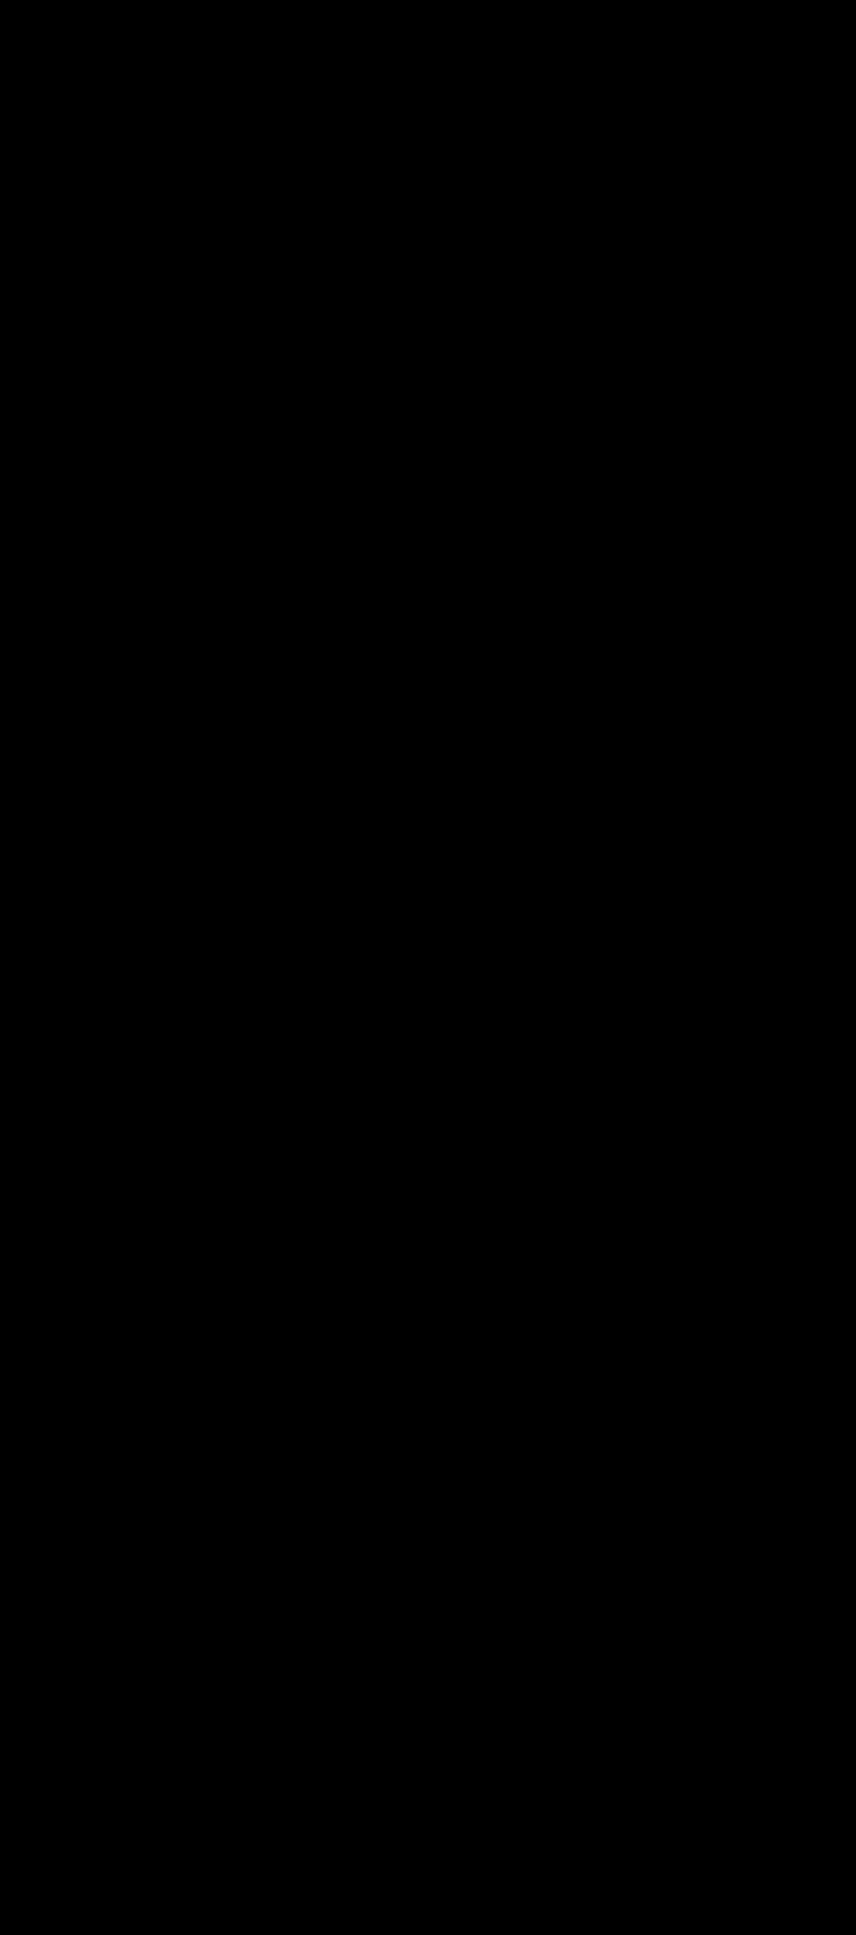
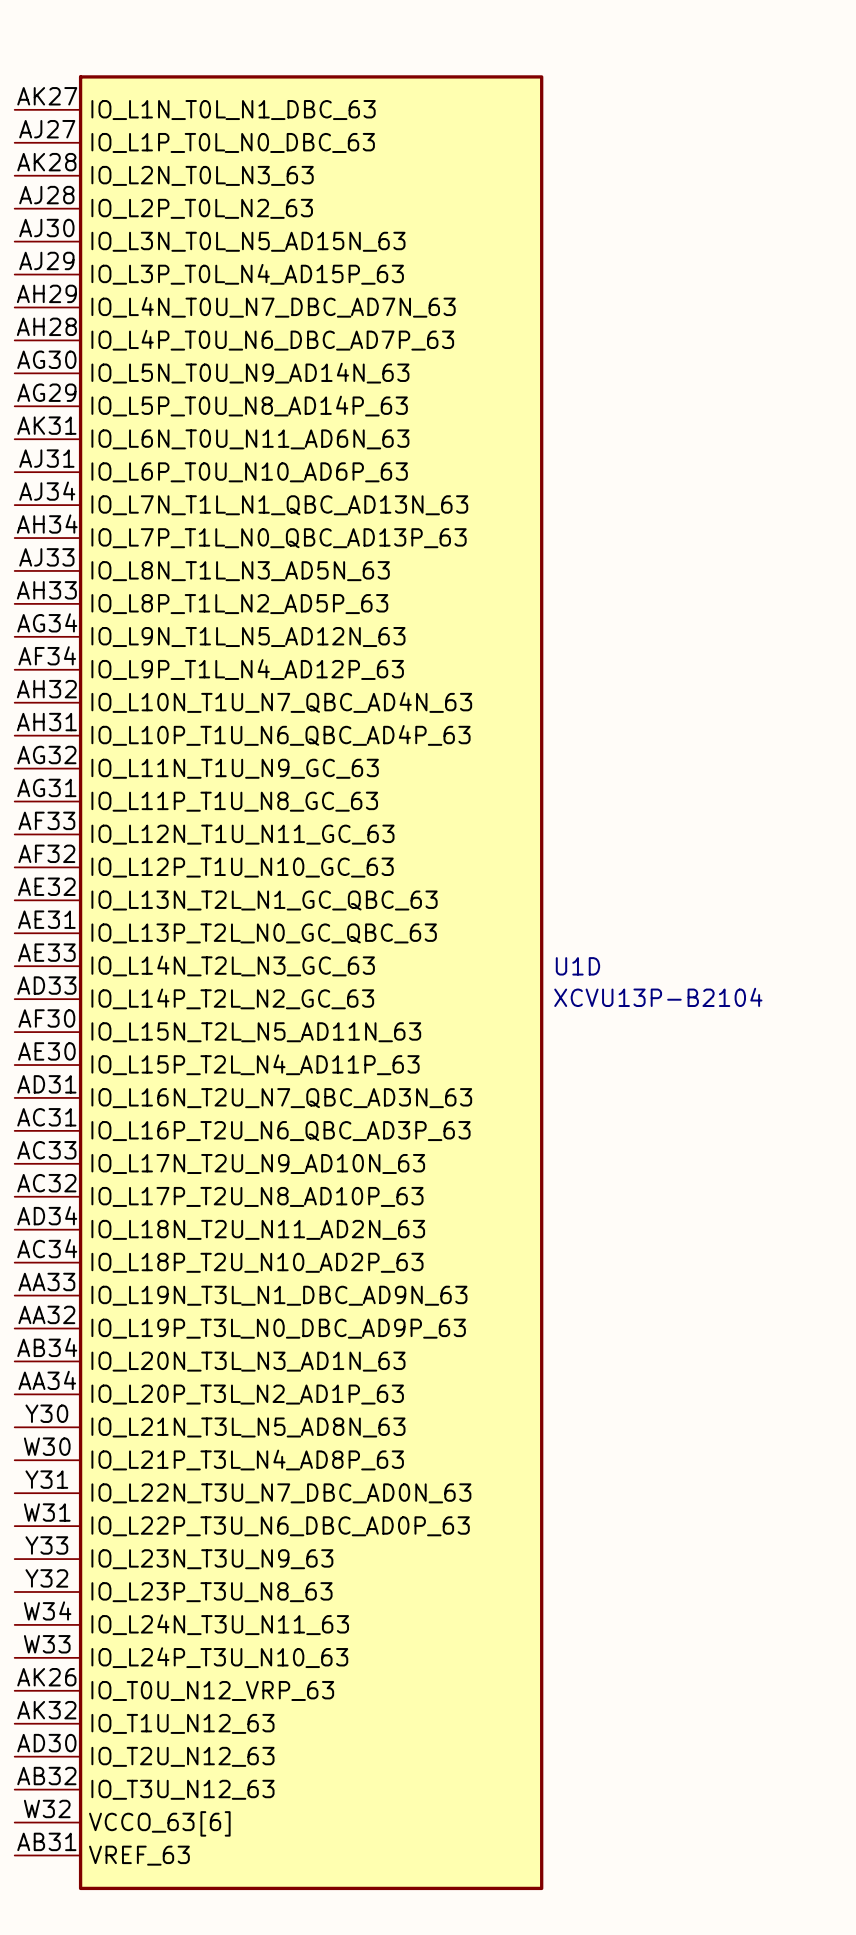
U1D: none -> XCVU13P-B2104 (279, 982)

